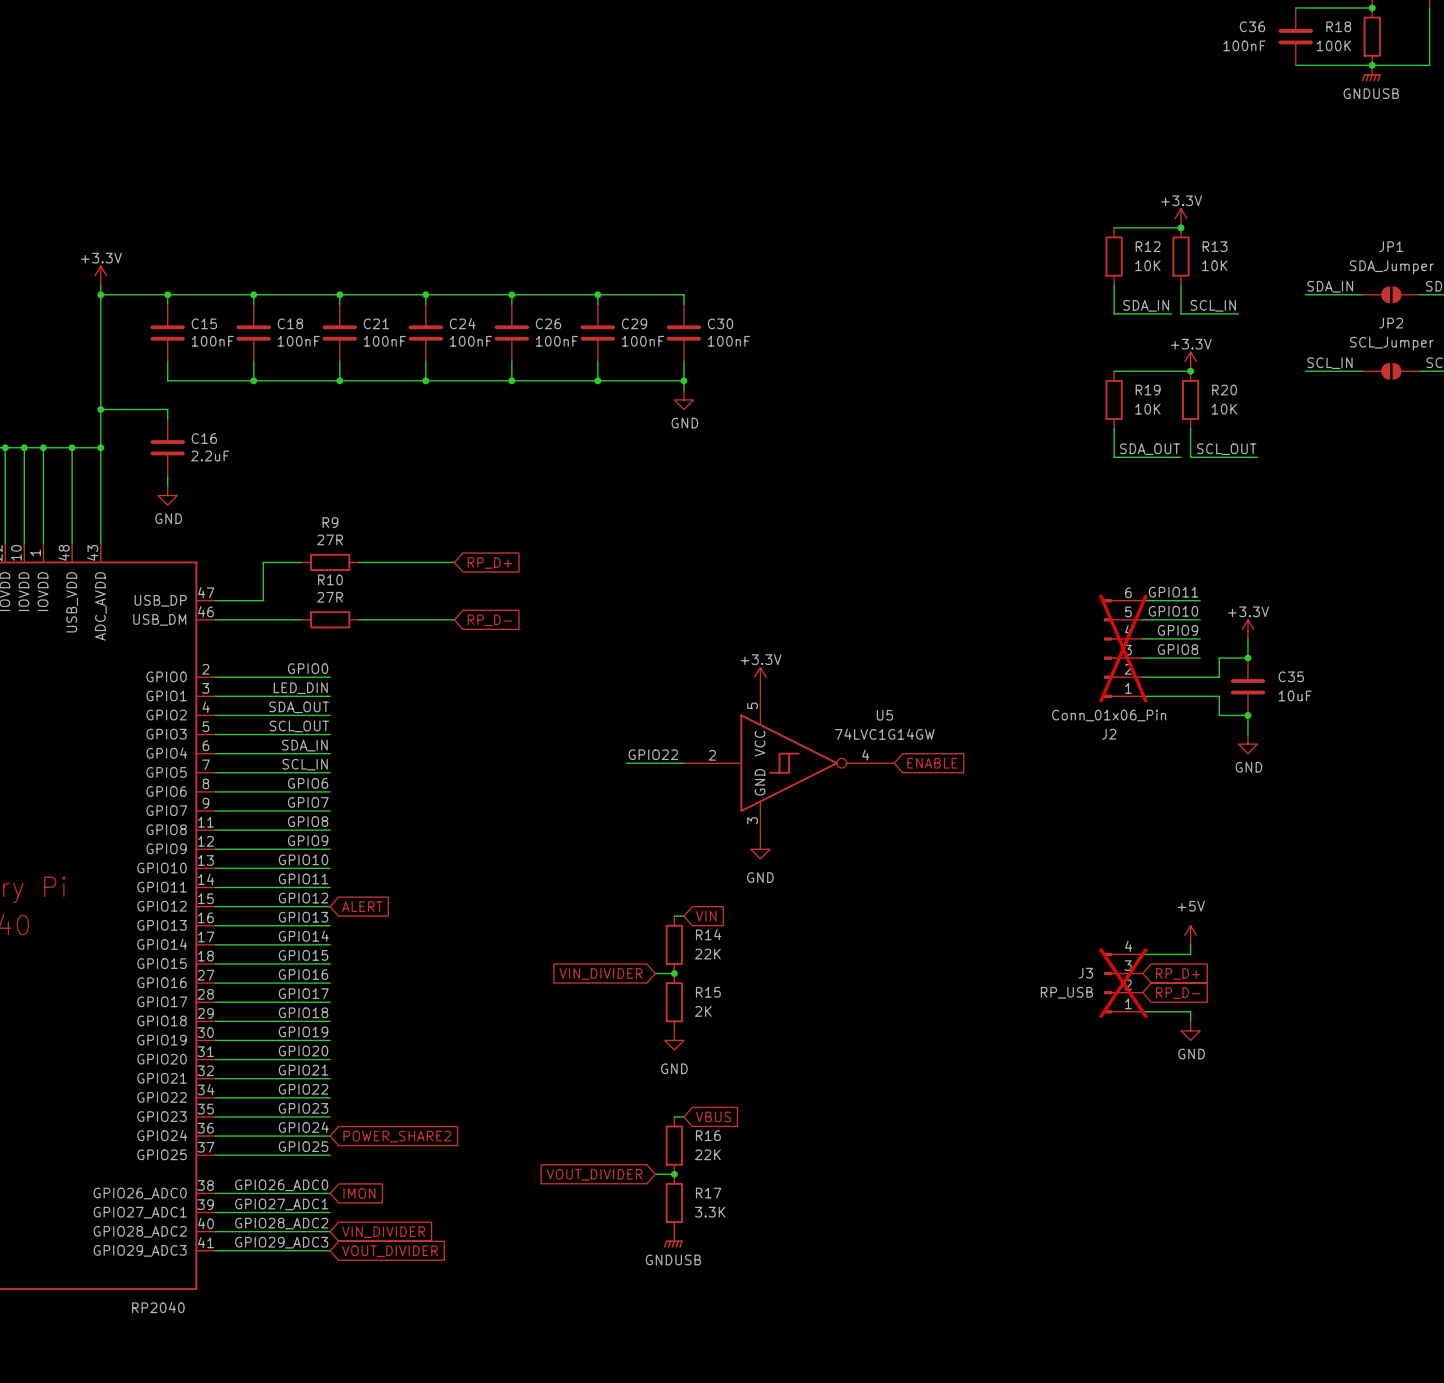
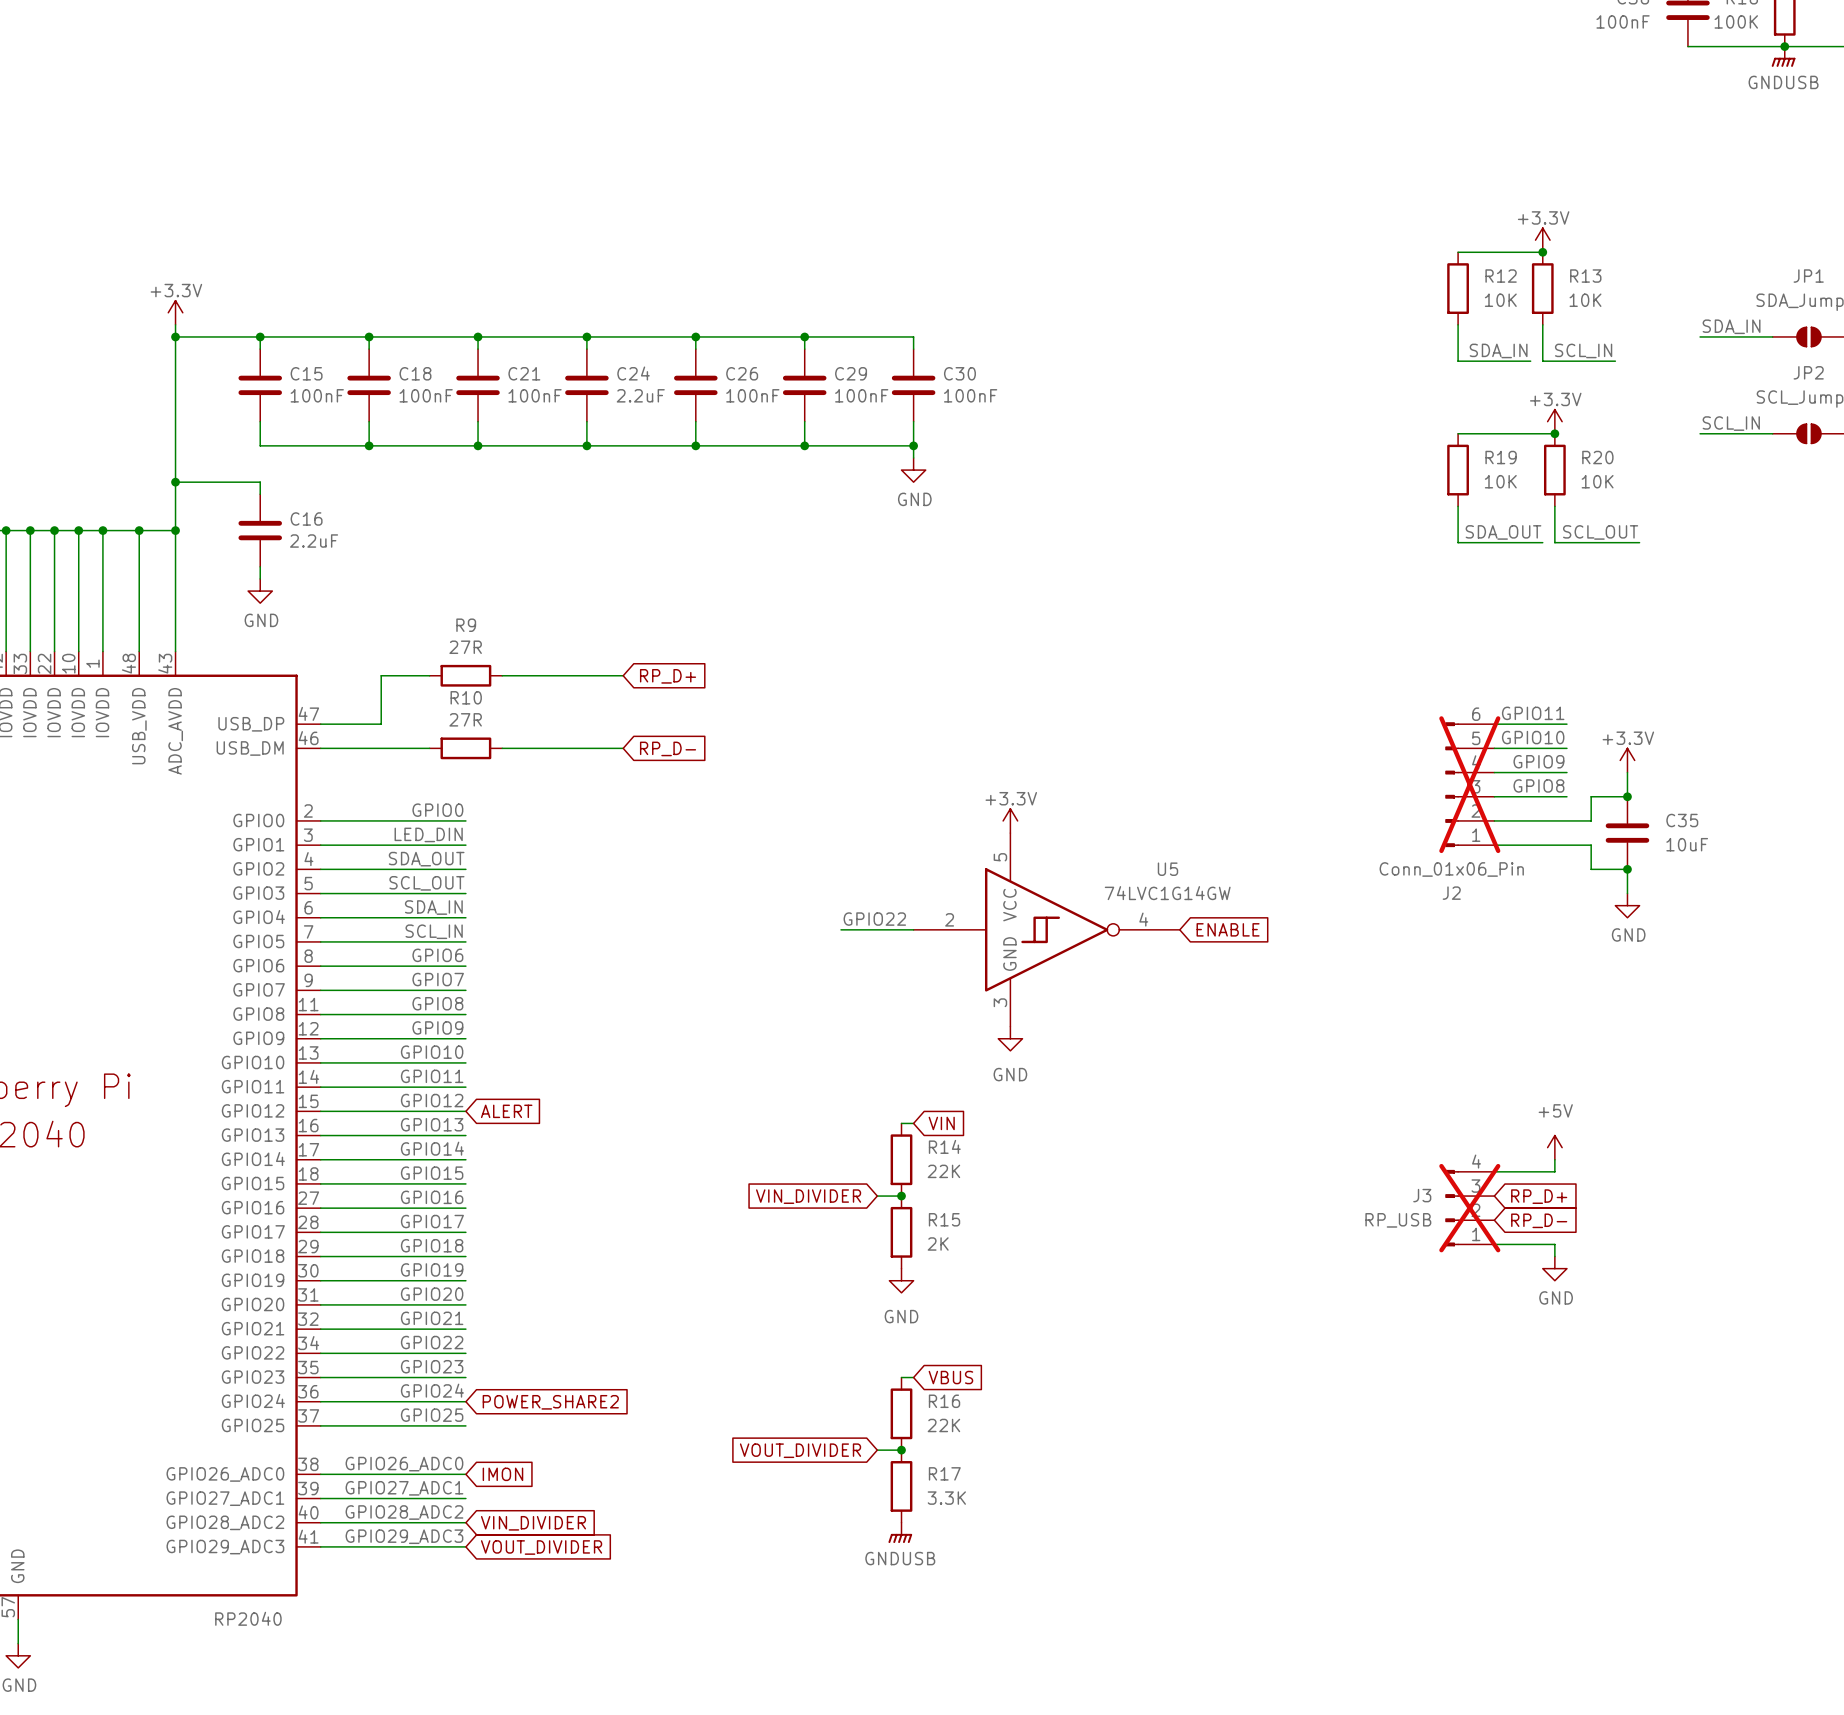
C24 value: 100nF (470, 341) -> 2.2uF (640, 395)

